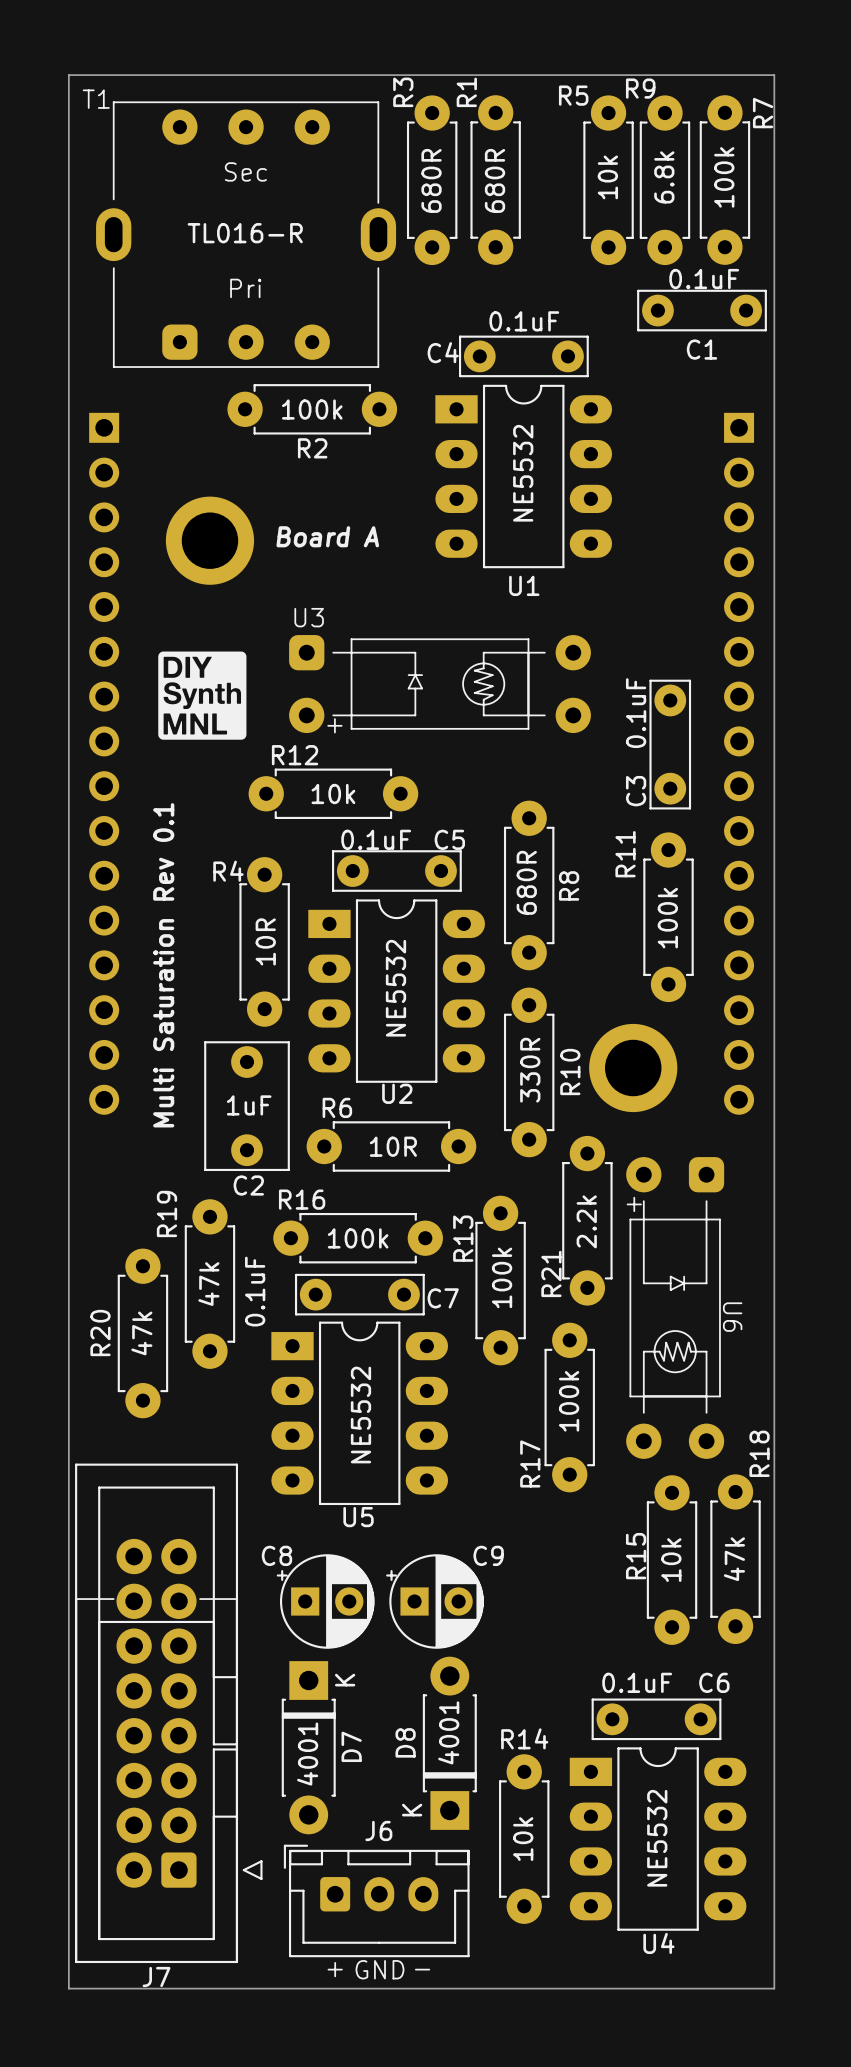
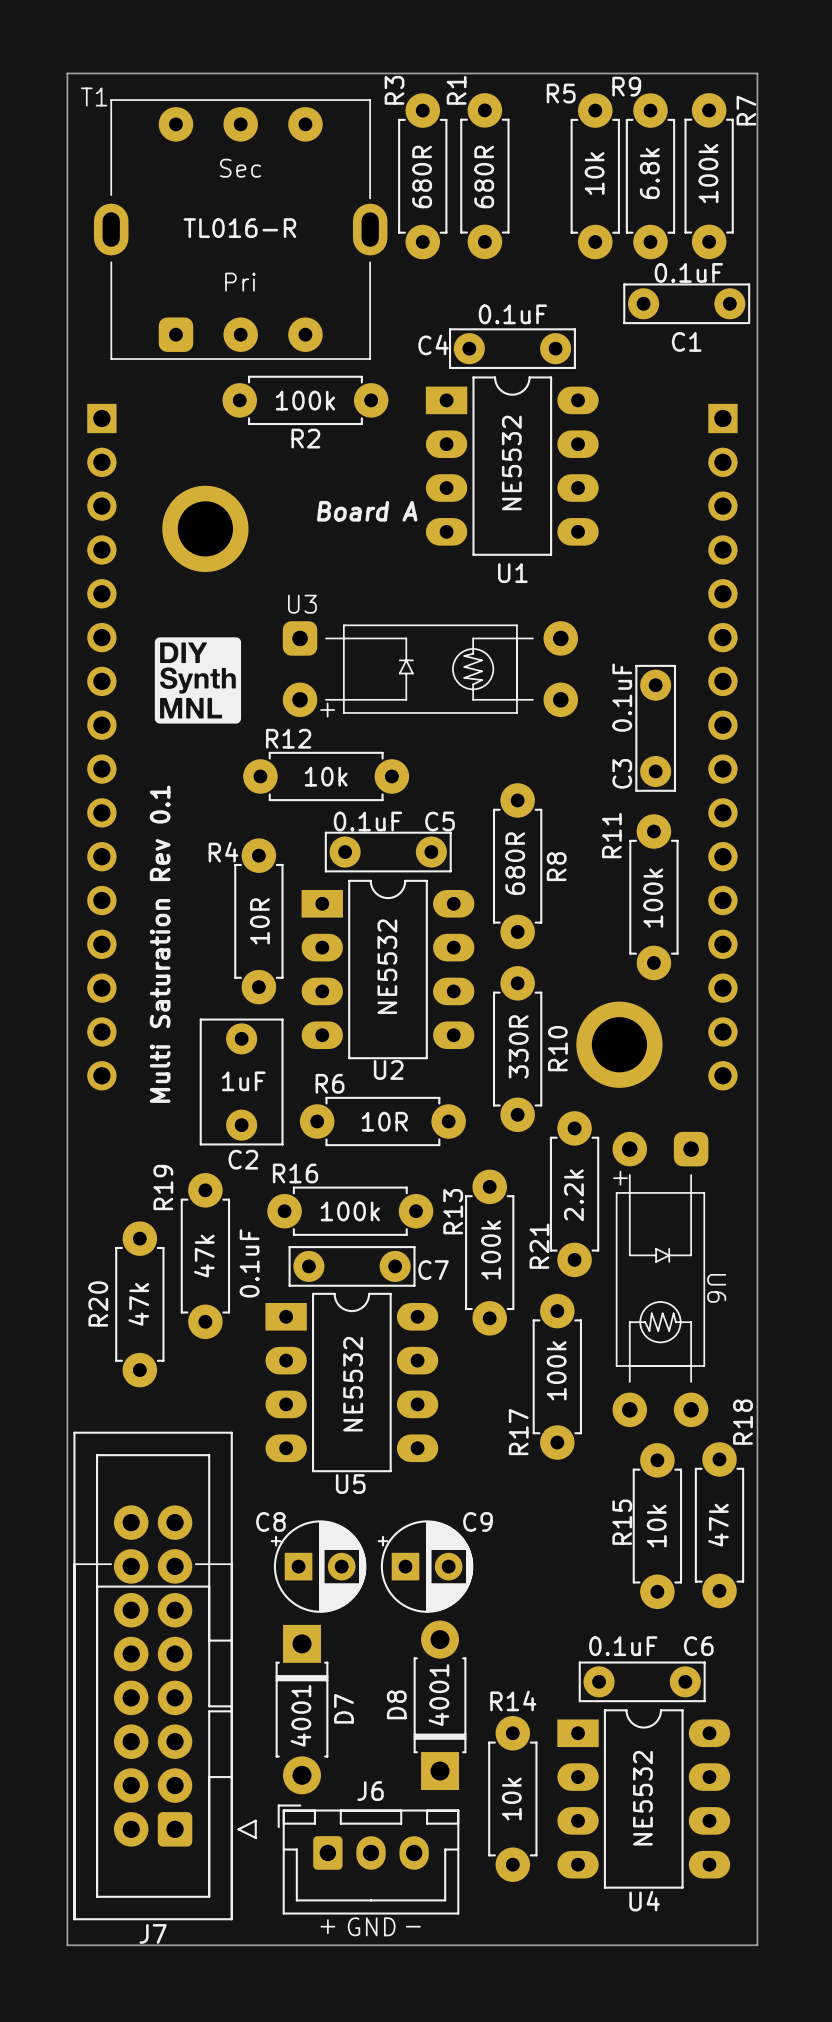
text position: Board A (327, 536) -> Board A (367, 511)
D7 text: K (345, 1680) -> none
D8 text: K (412, 1810) -> none

